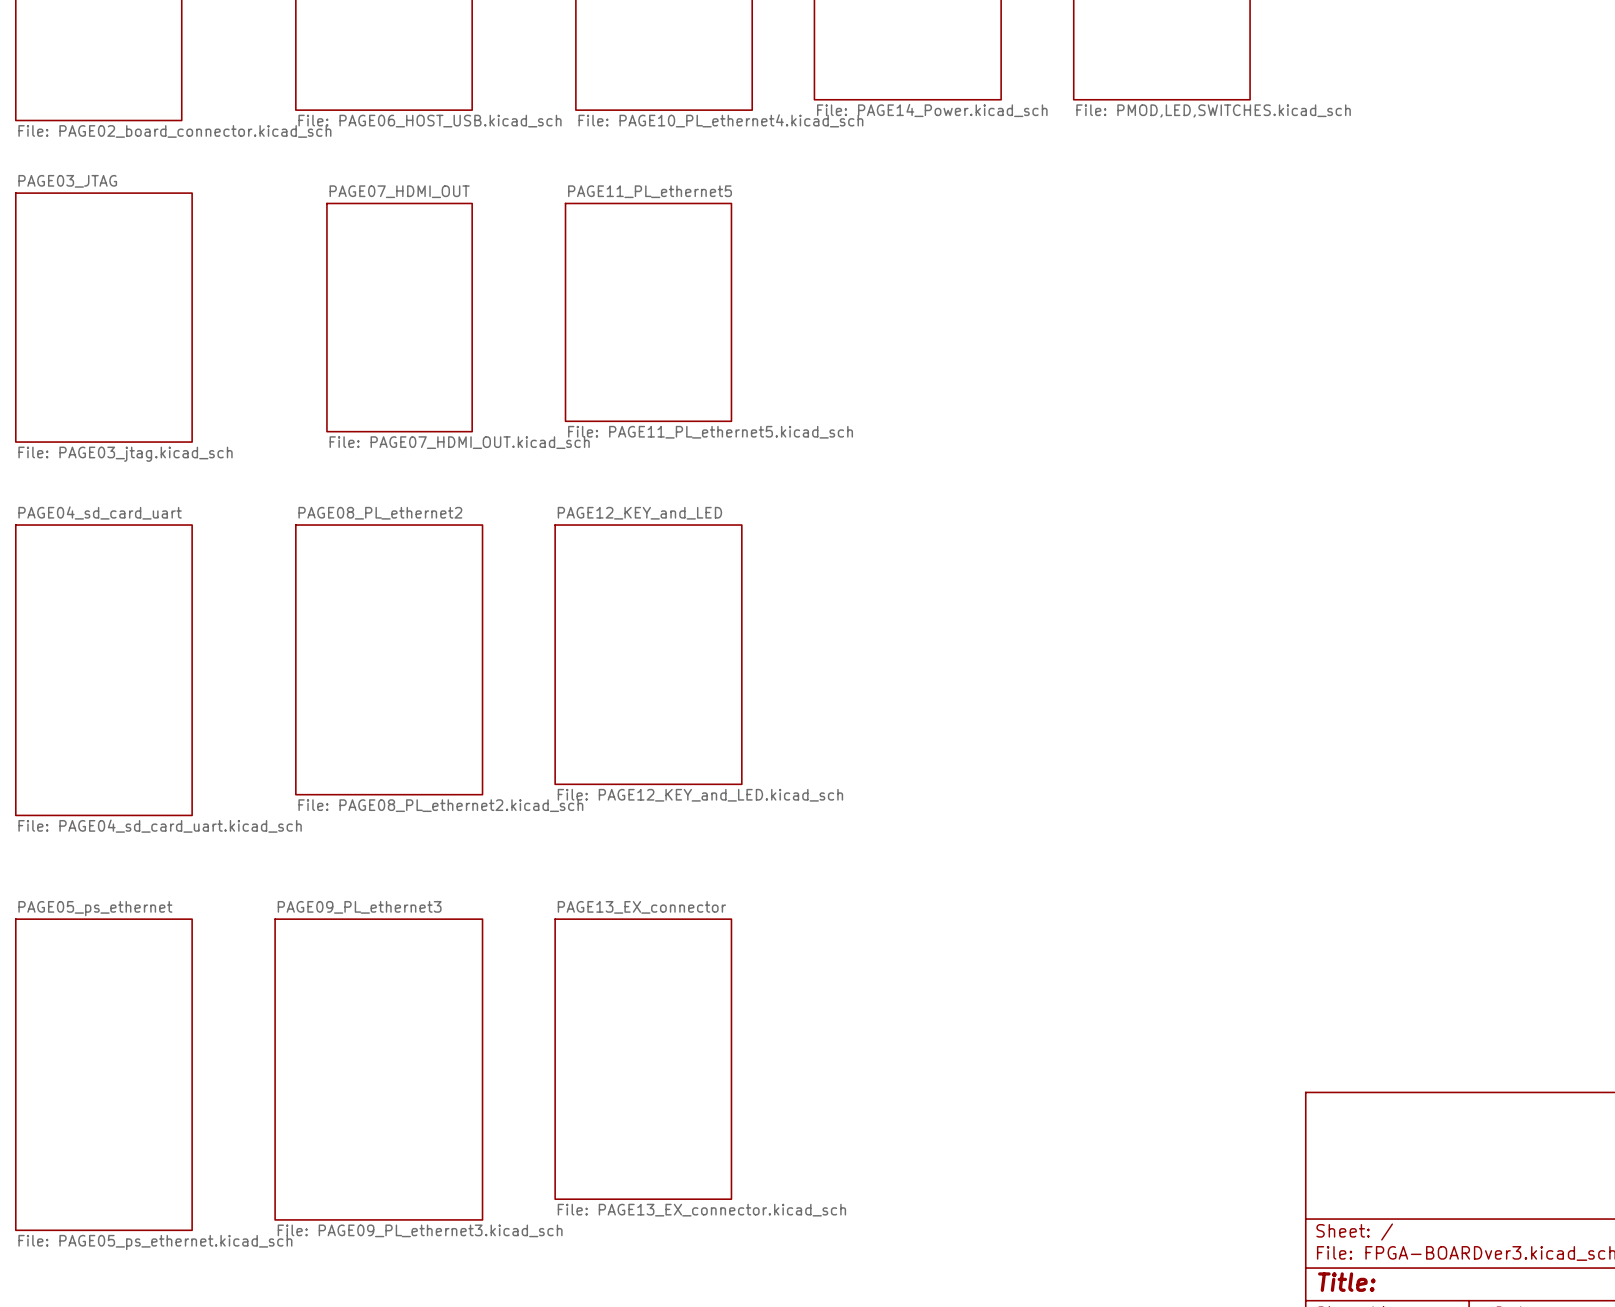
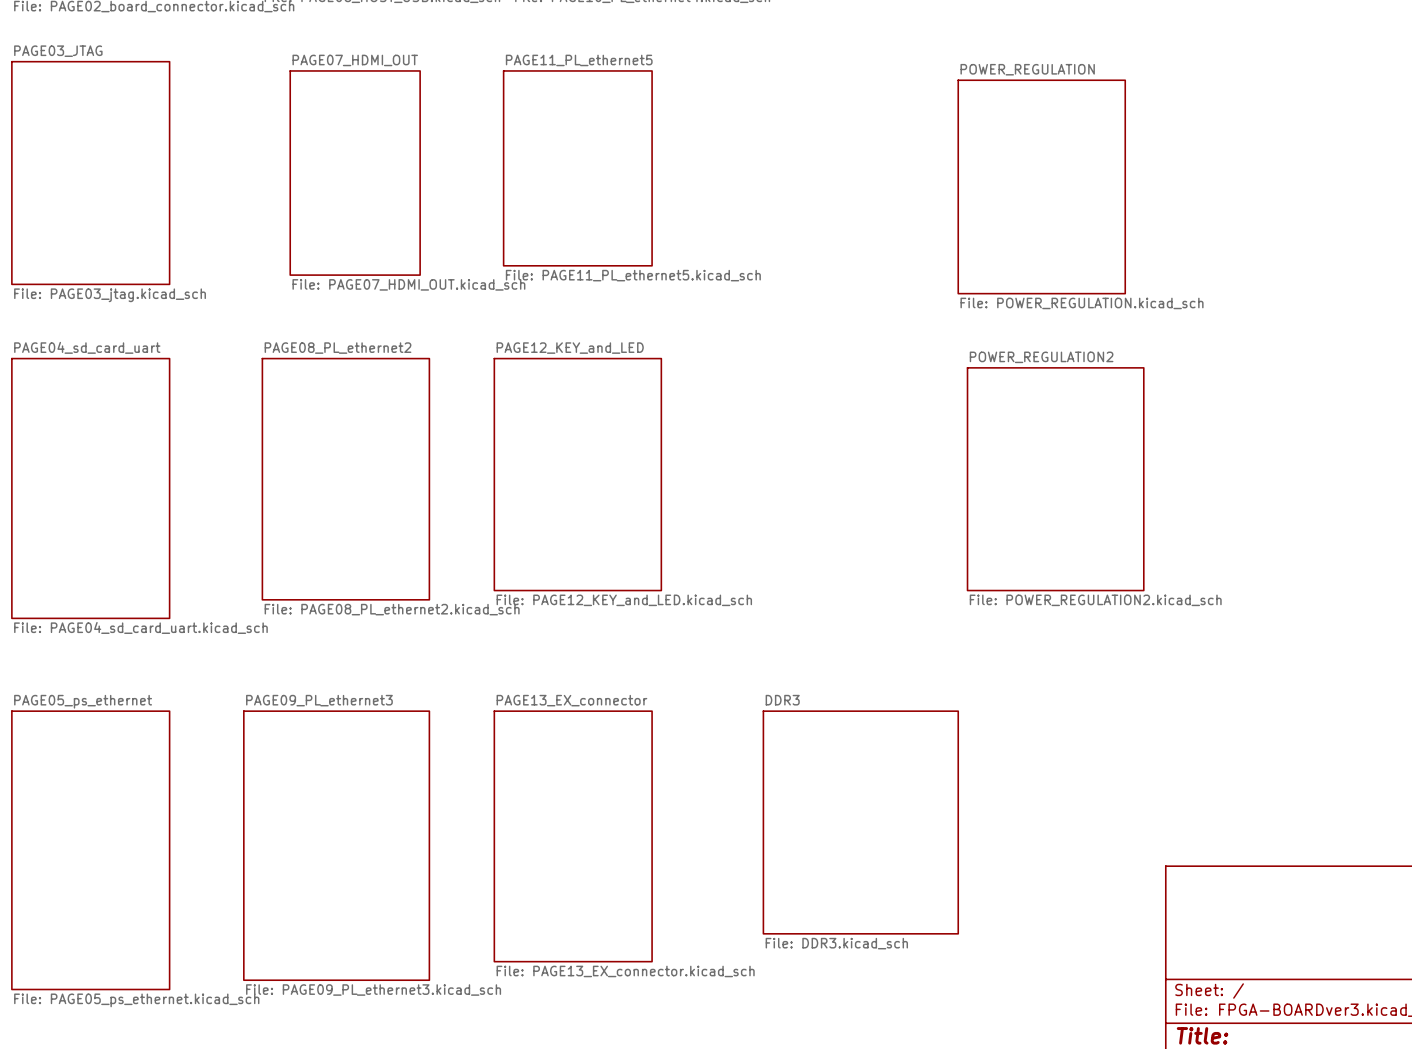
sheet POWER_REGULATION: none -> File: POWER_REGULATION.kicad_sch (1041, 186)
sheet POWER_REGULATION2: none -> File: POWER_REGULATION2.kicad_sch (1055, 479)
sheet DDR3: none -> File: DDR3.kicad_sch (860, 822)

